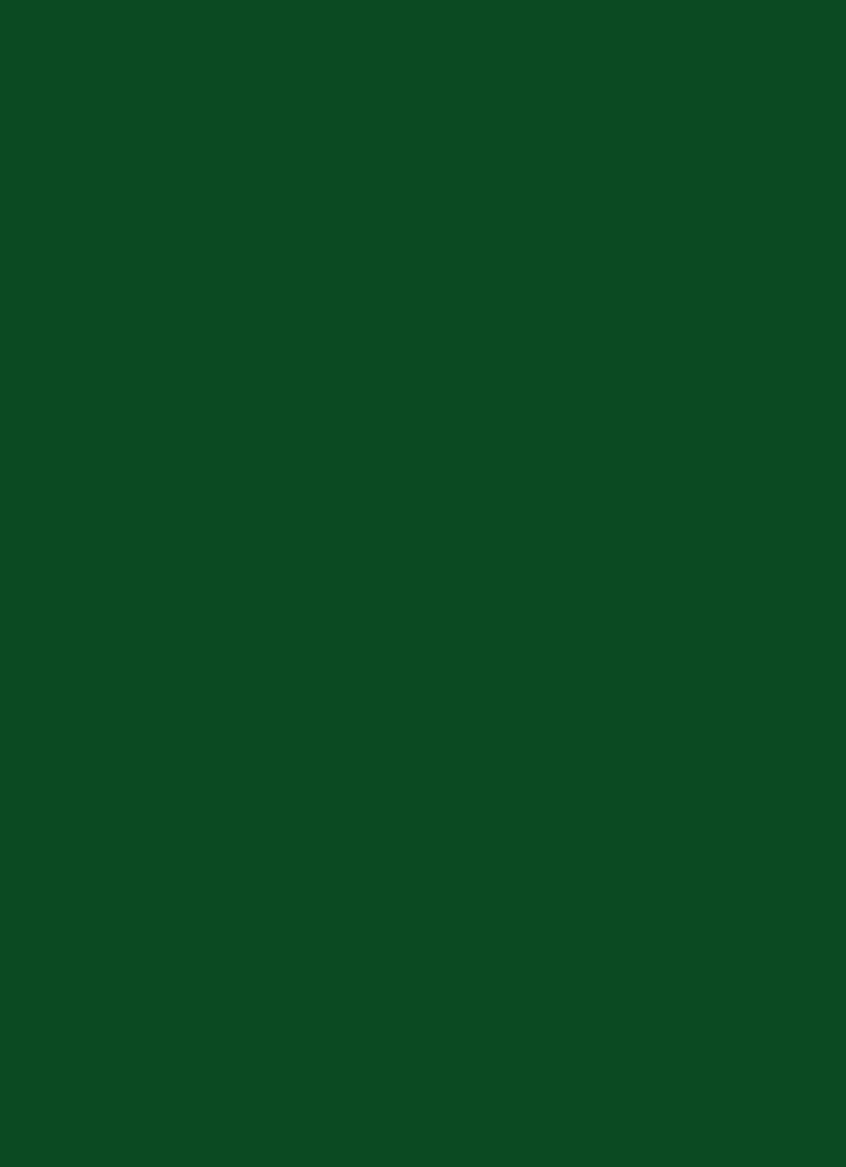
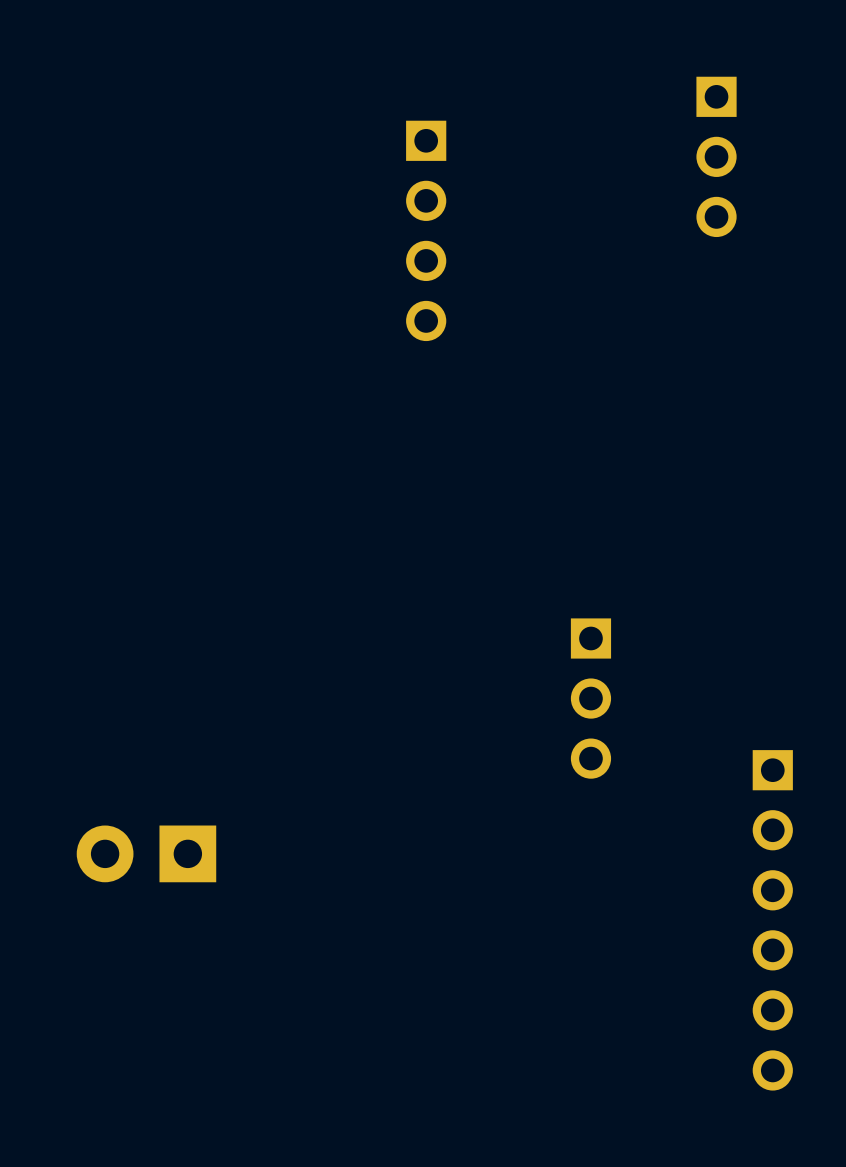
part: none -> (716, 156)
part: none -> (426, 230)
part: none -> (590, 698)
part: none -> (146, 853)
part: none -> (772, 920)

